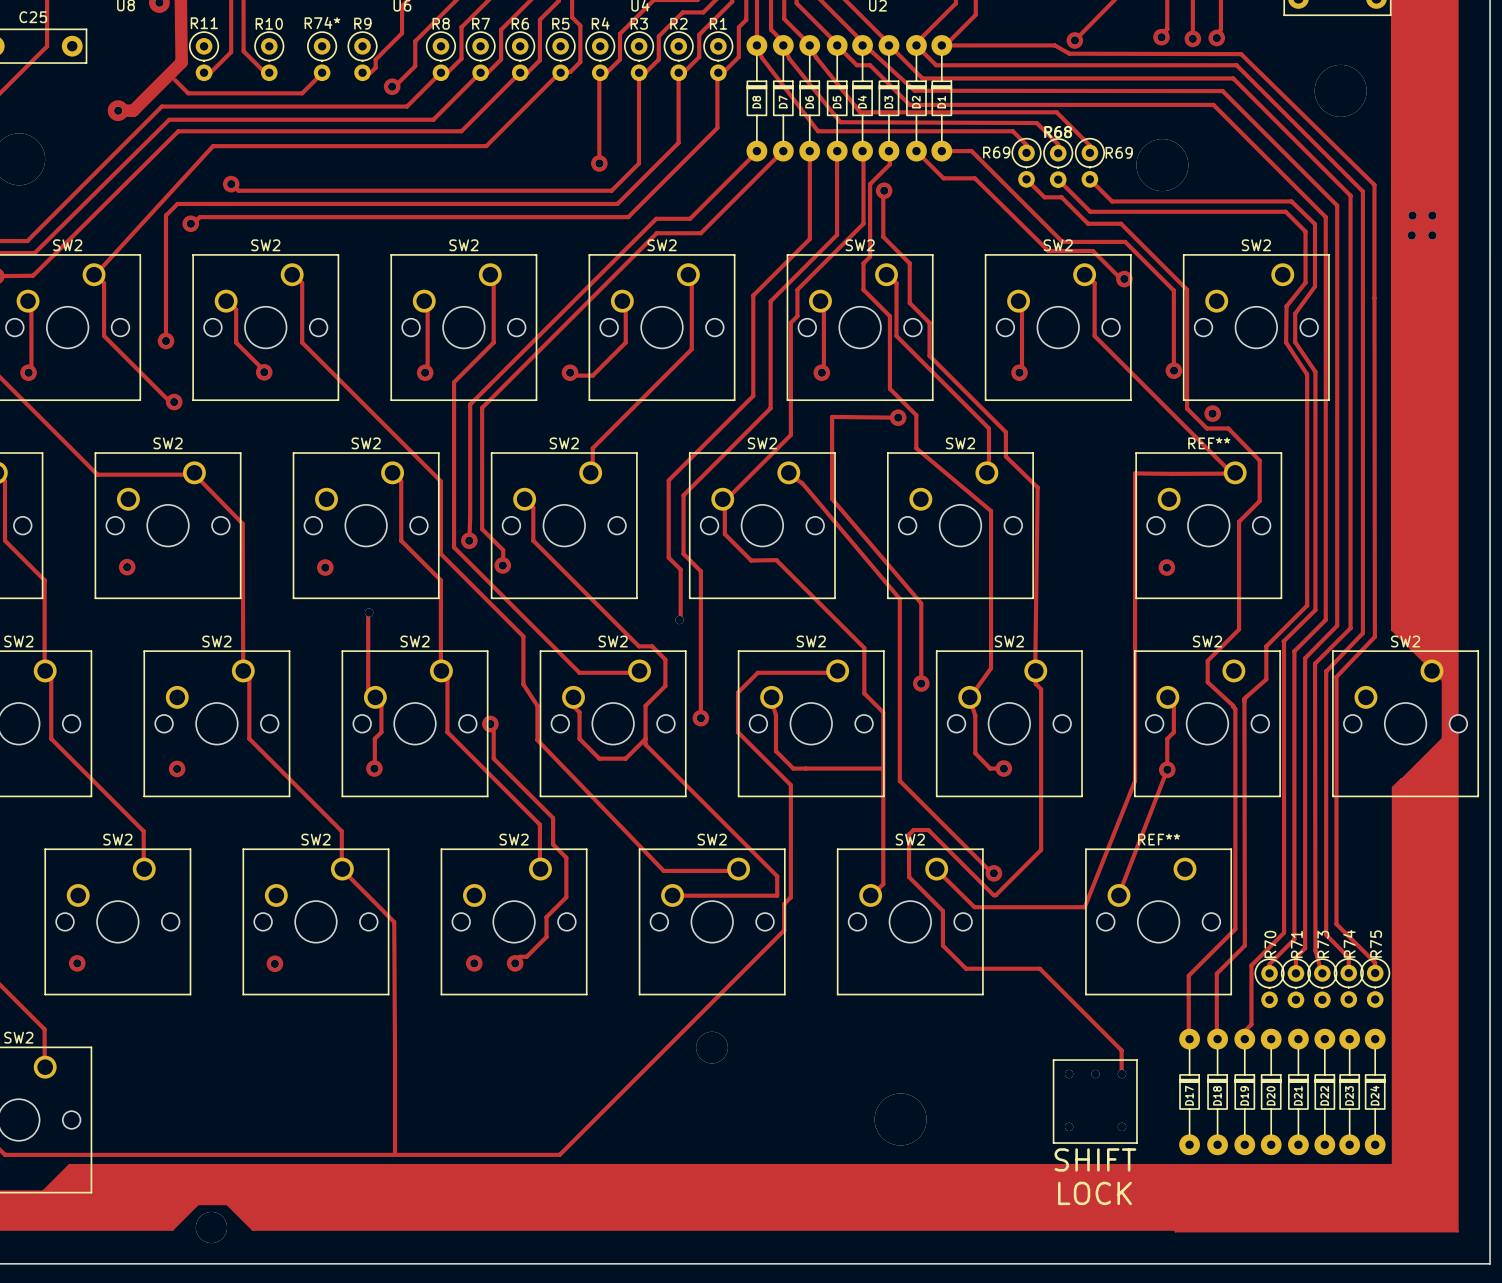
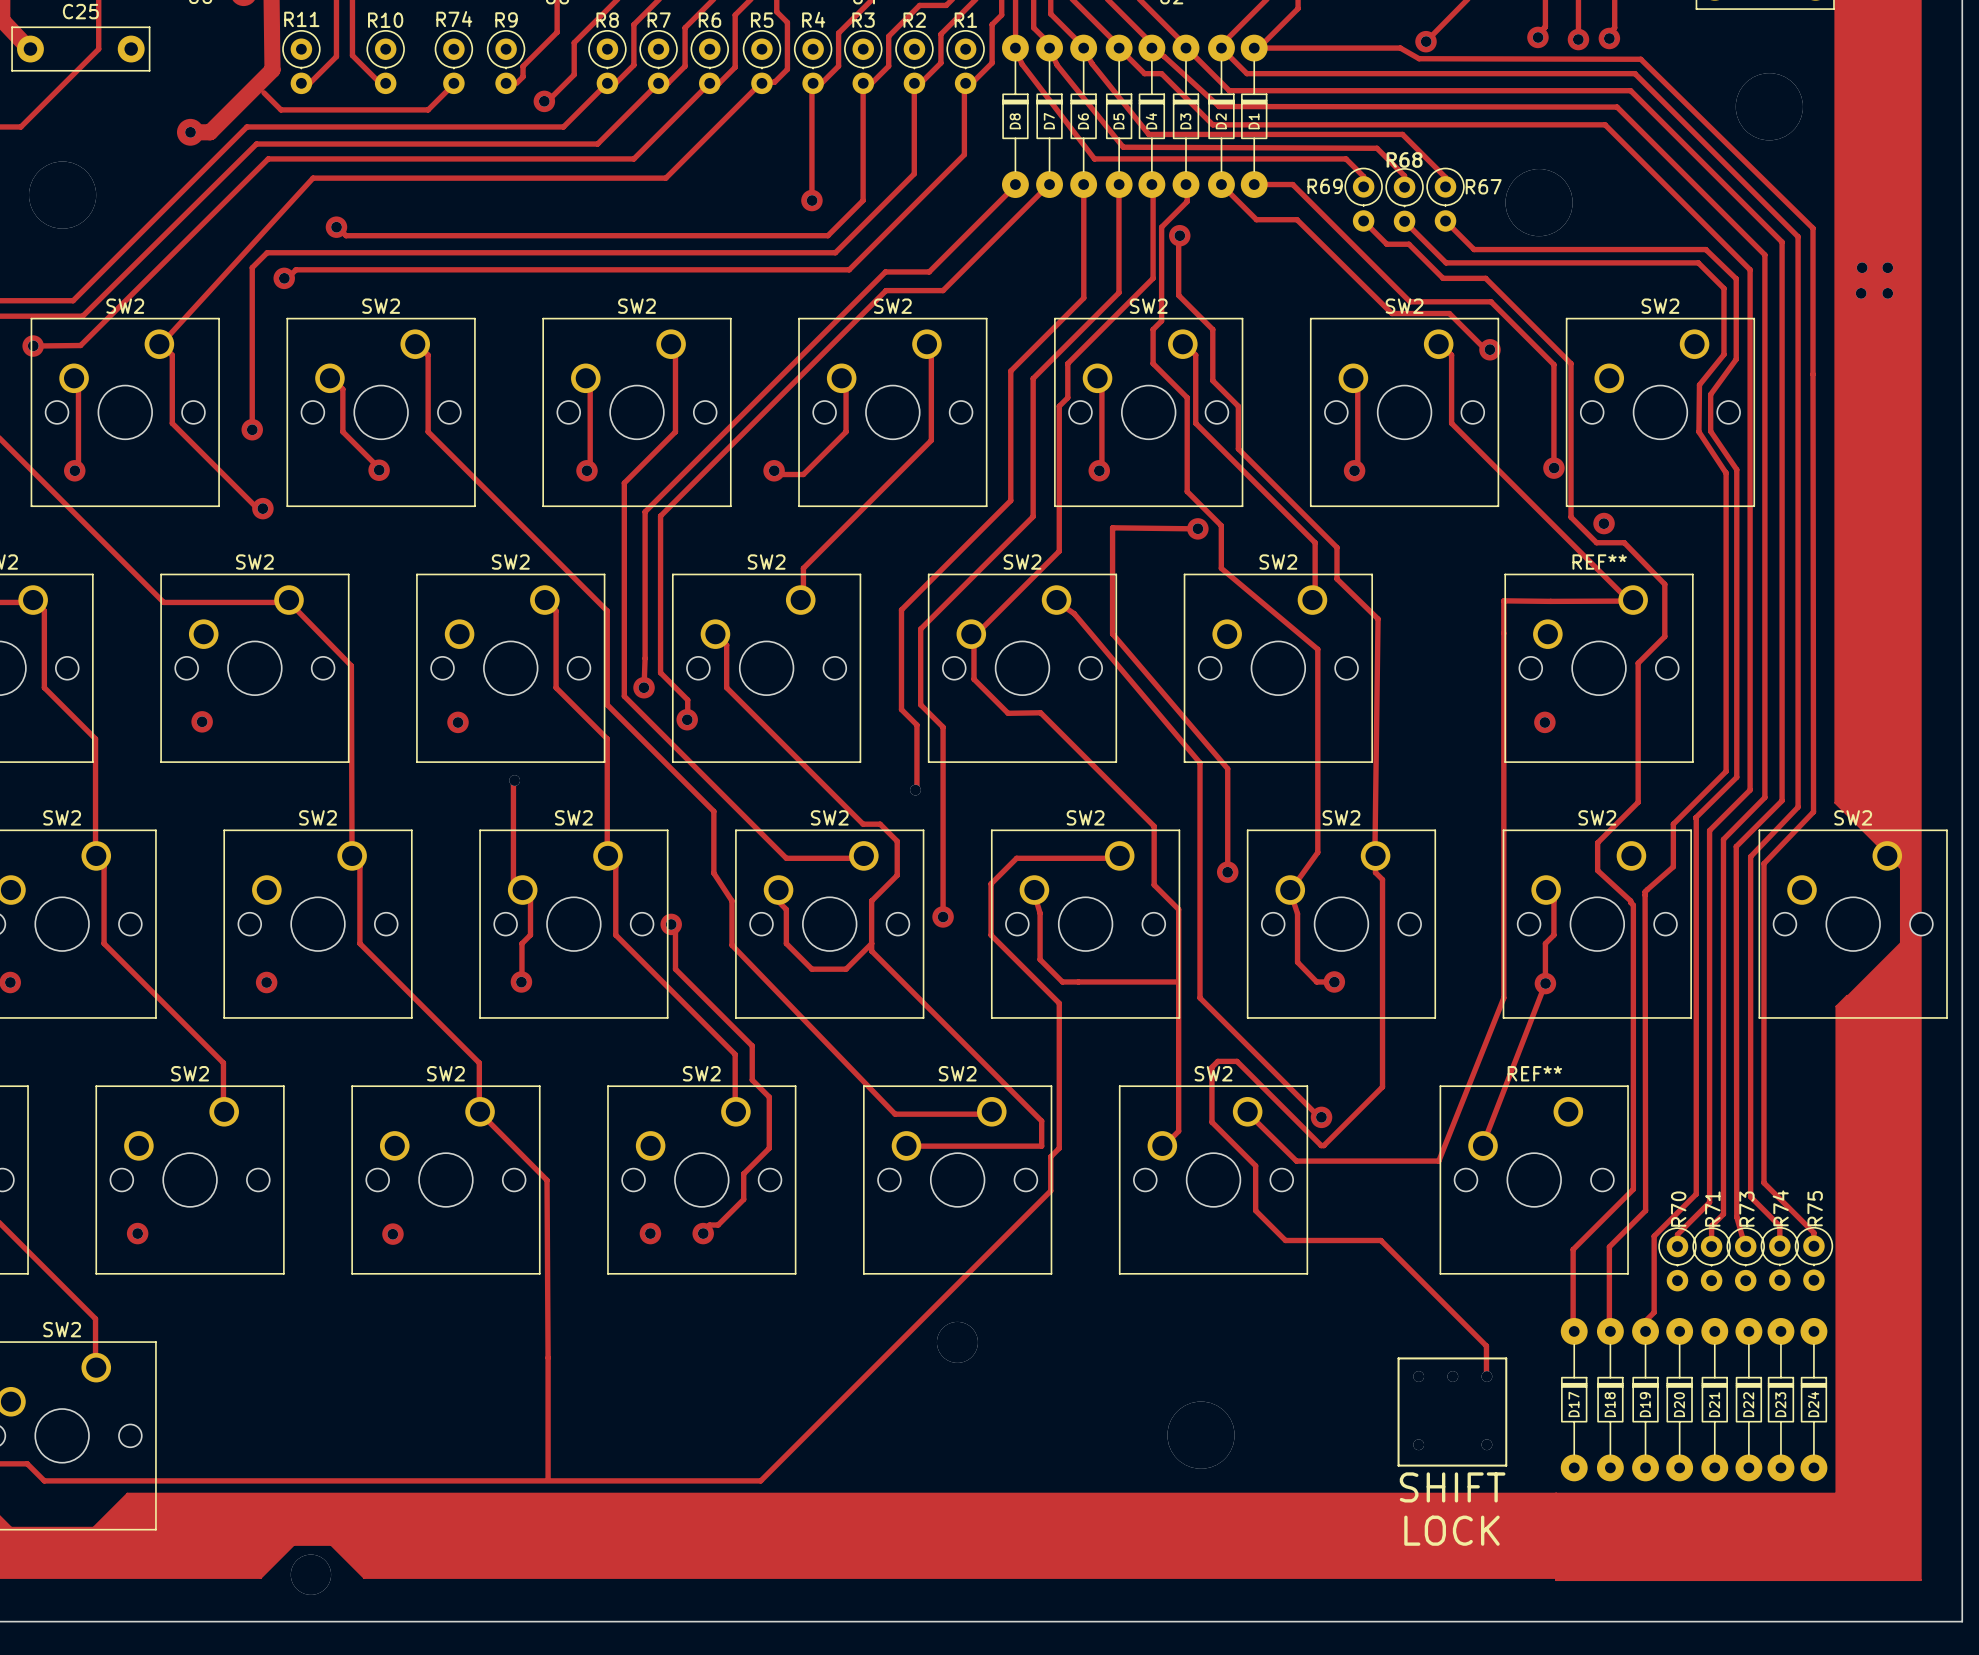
R74* name: R74* (322, 22) -> R74 (454, 19)
R69 name: R69 (1119, 152) -> R67 (1483, 186)

